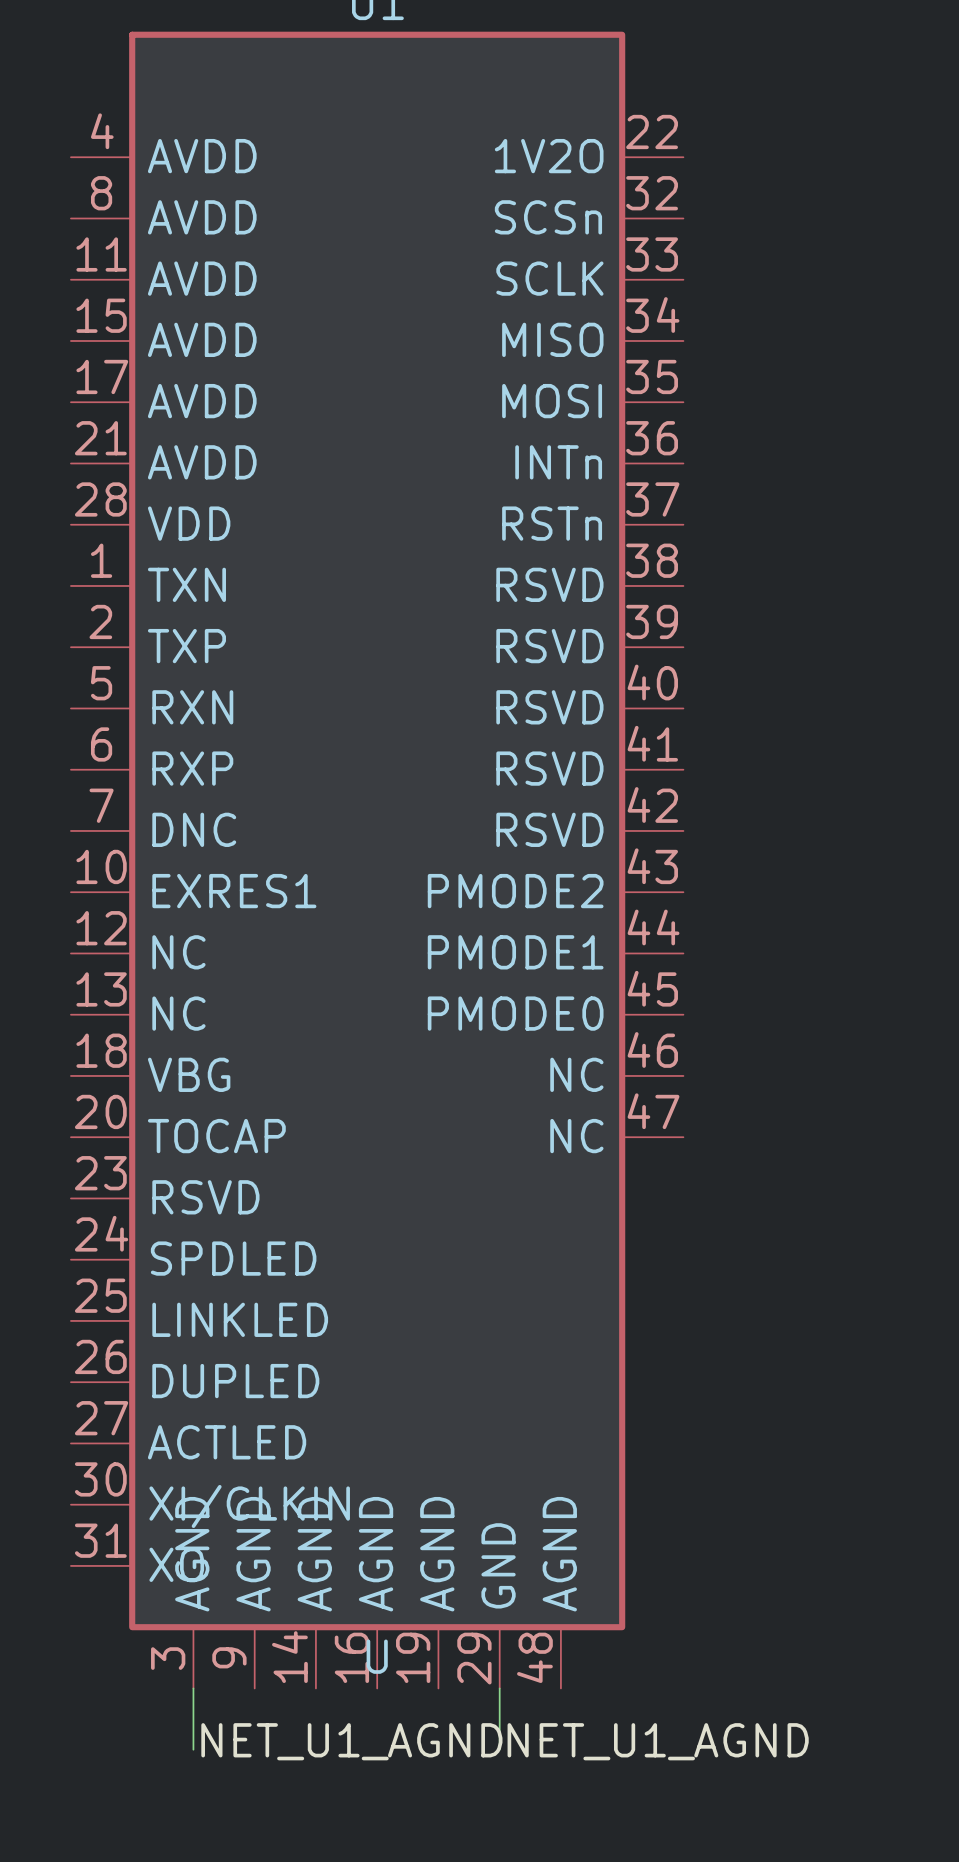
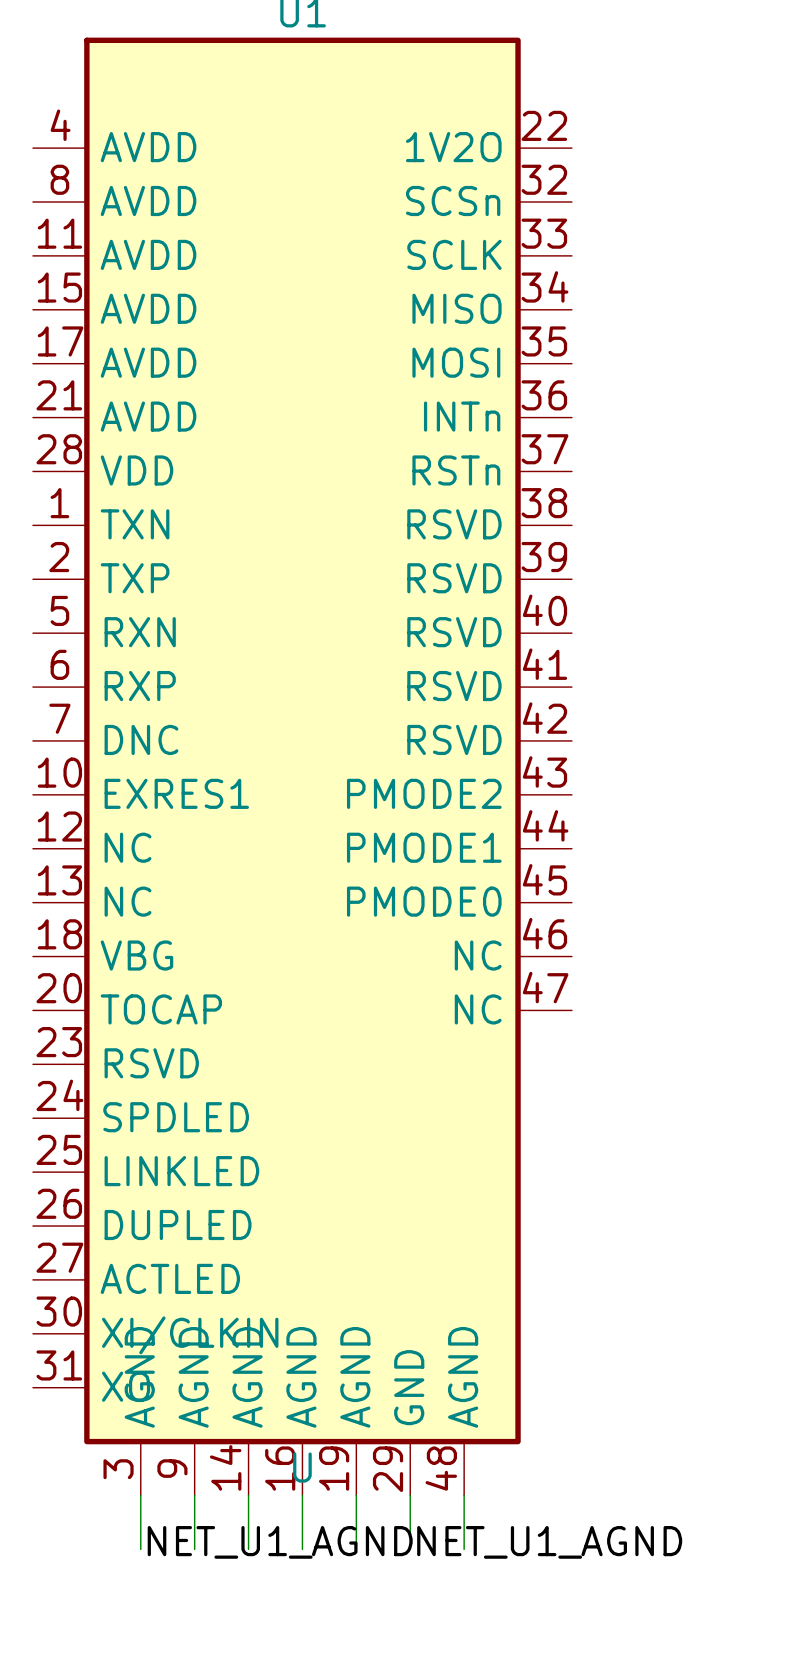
wire: none -> (194, 1495) (194, 1549)
wire: none -> (248, 1495) (248, 1549)
wire: none -> (302, 1495) (302, 1549)
wire: none -> (356, 1495) (356, 1549)
wire: none -> (464, 1495) (464, 1549)

